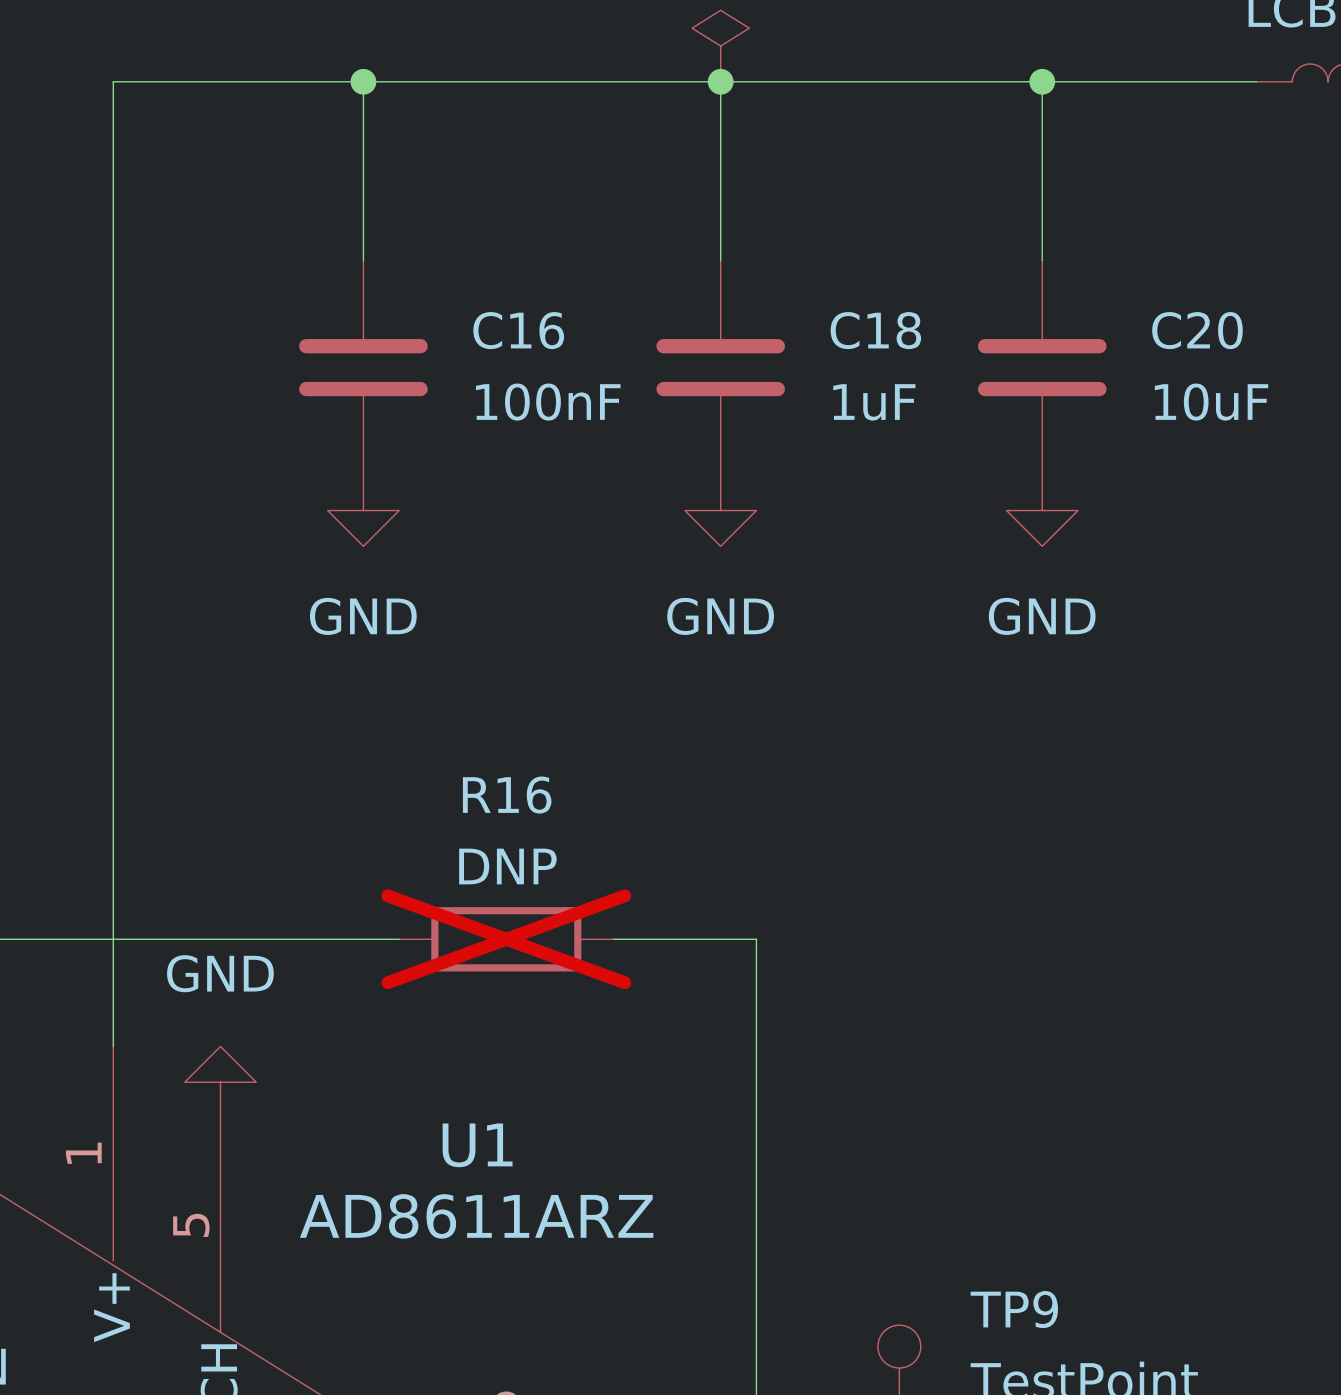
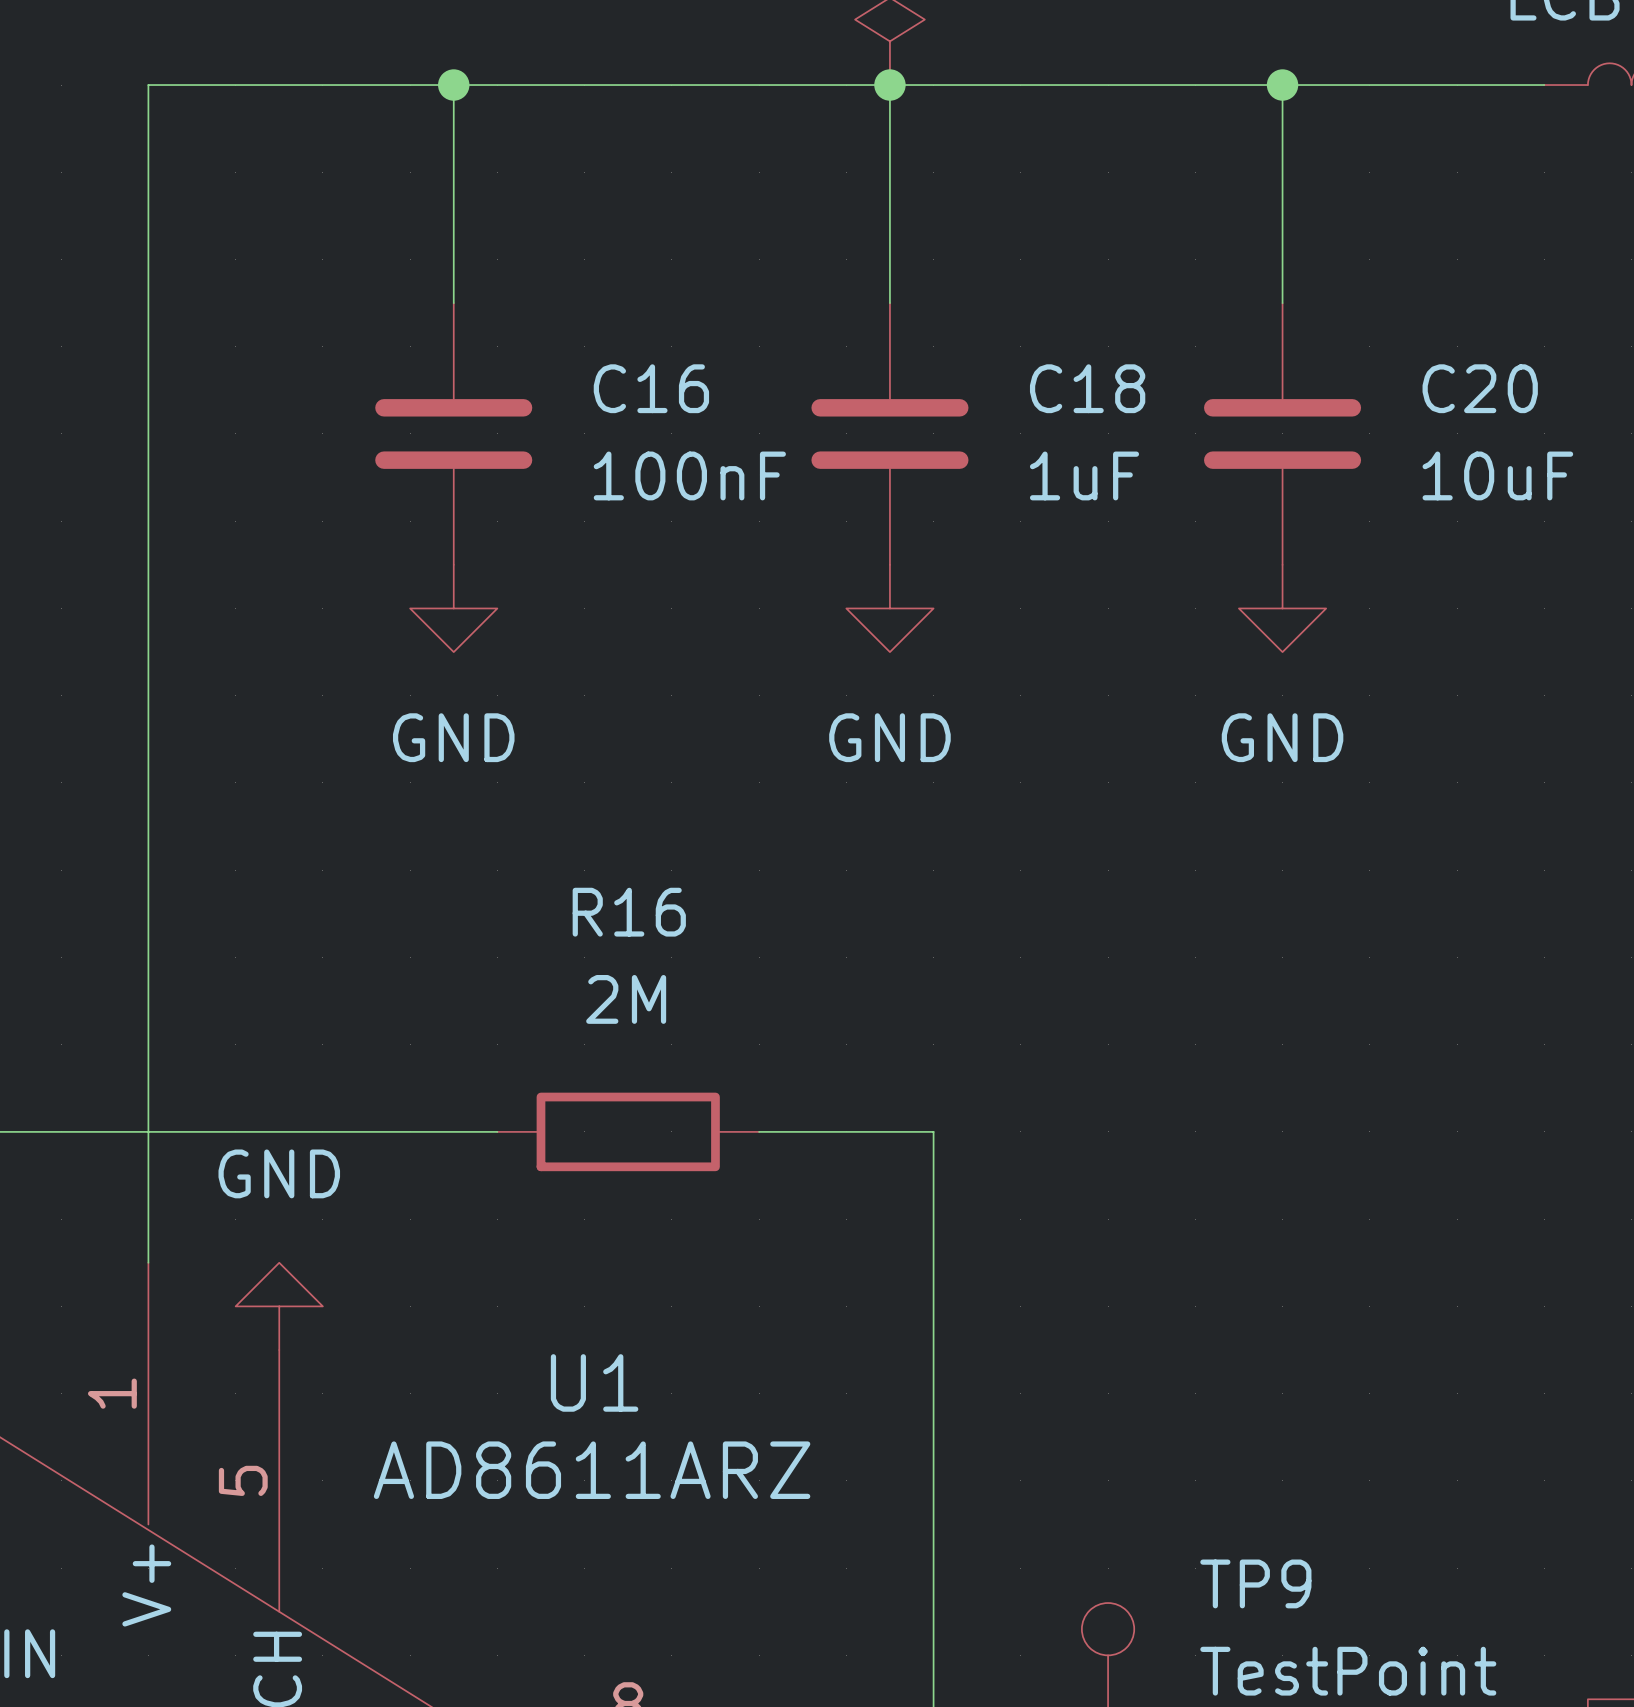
R16 name position: R16 (507, 795) -> R16 (629, 912)
R16 value: DNP (507, 866) -> 2M (626, 999)
R16 do-not-place cross: (506, 939) -> none

